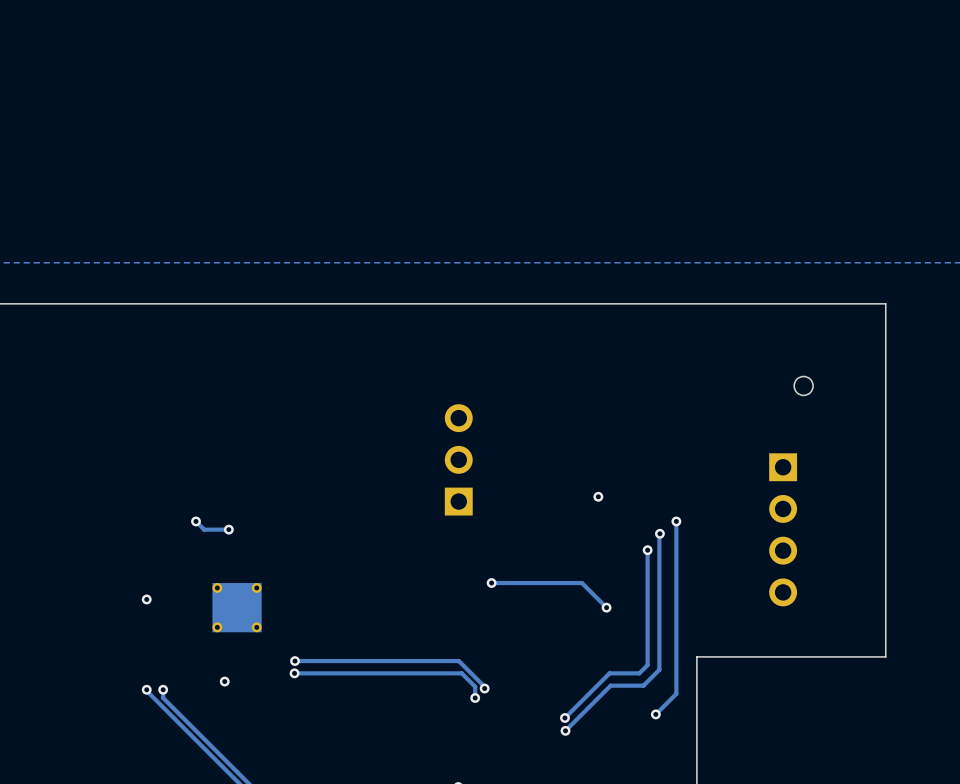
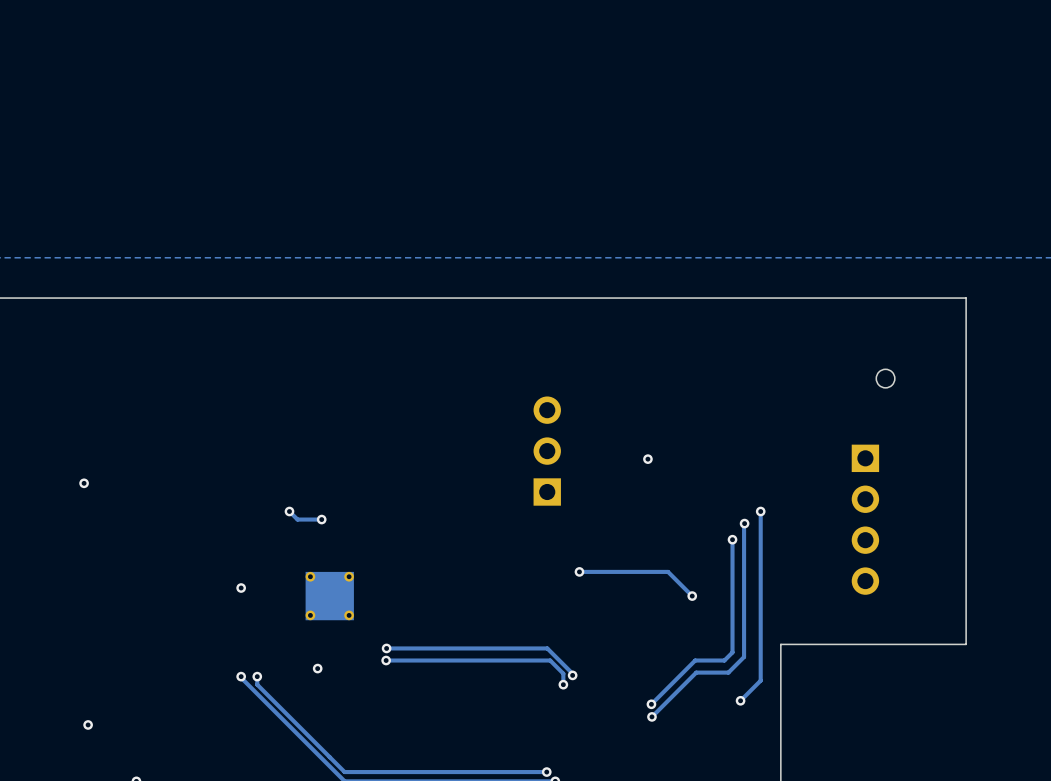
via position: (598, 496) -> (647, 459)

